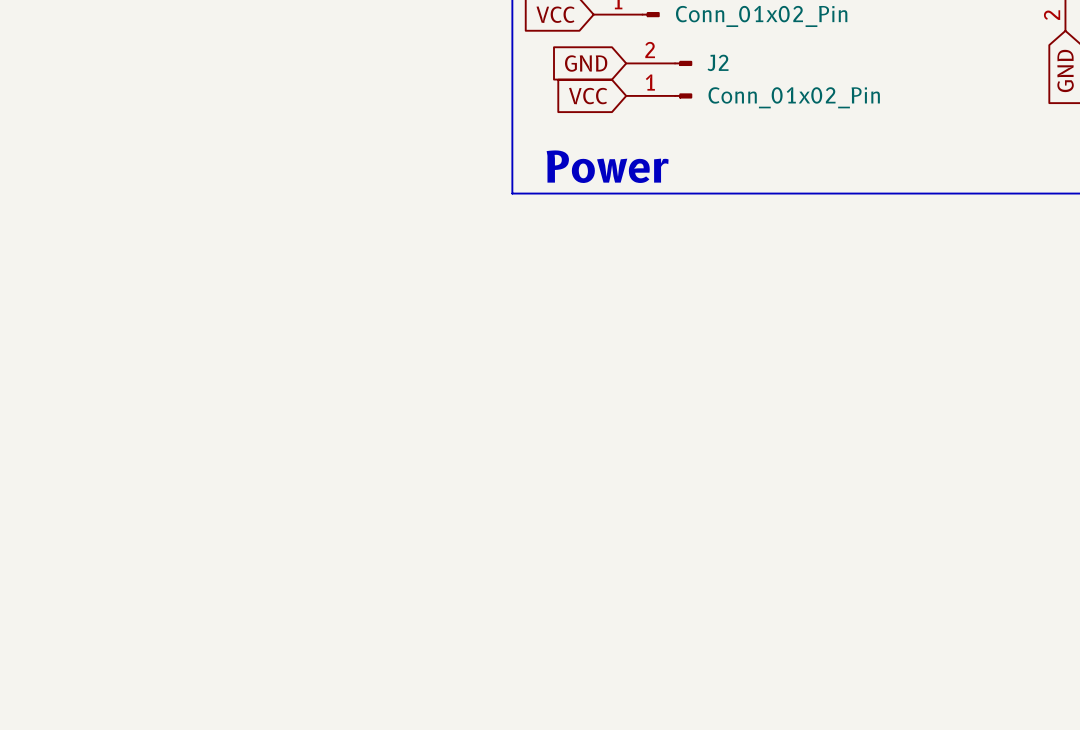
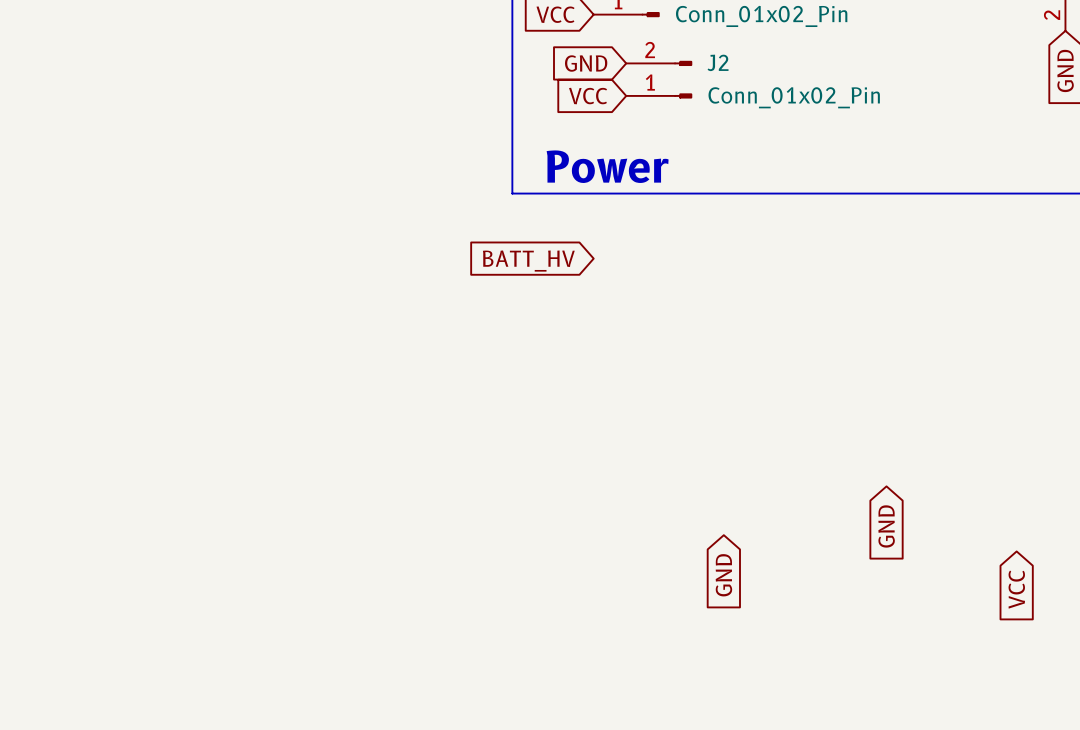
global label: none -> BATT_HV (528, 261)
global label: none -> GND (886, 526)
global label: none -> GND (723, 575)
global label: none -> VCC (1016, 589)

